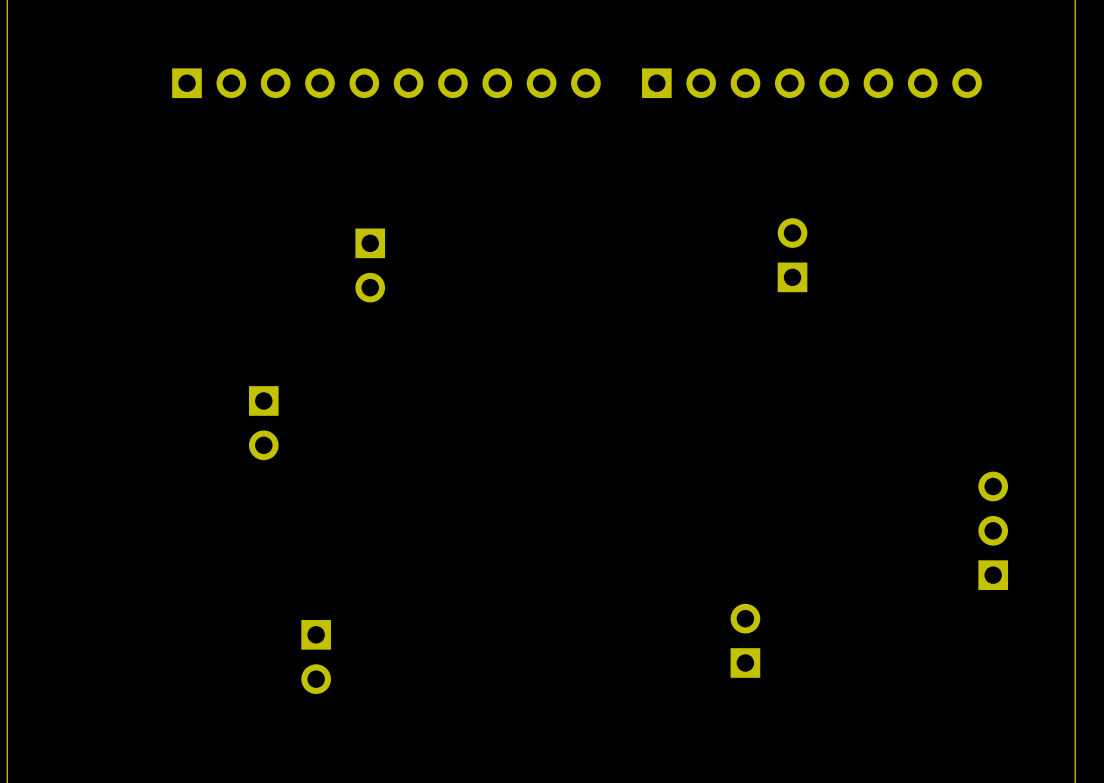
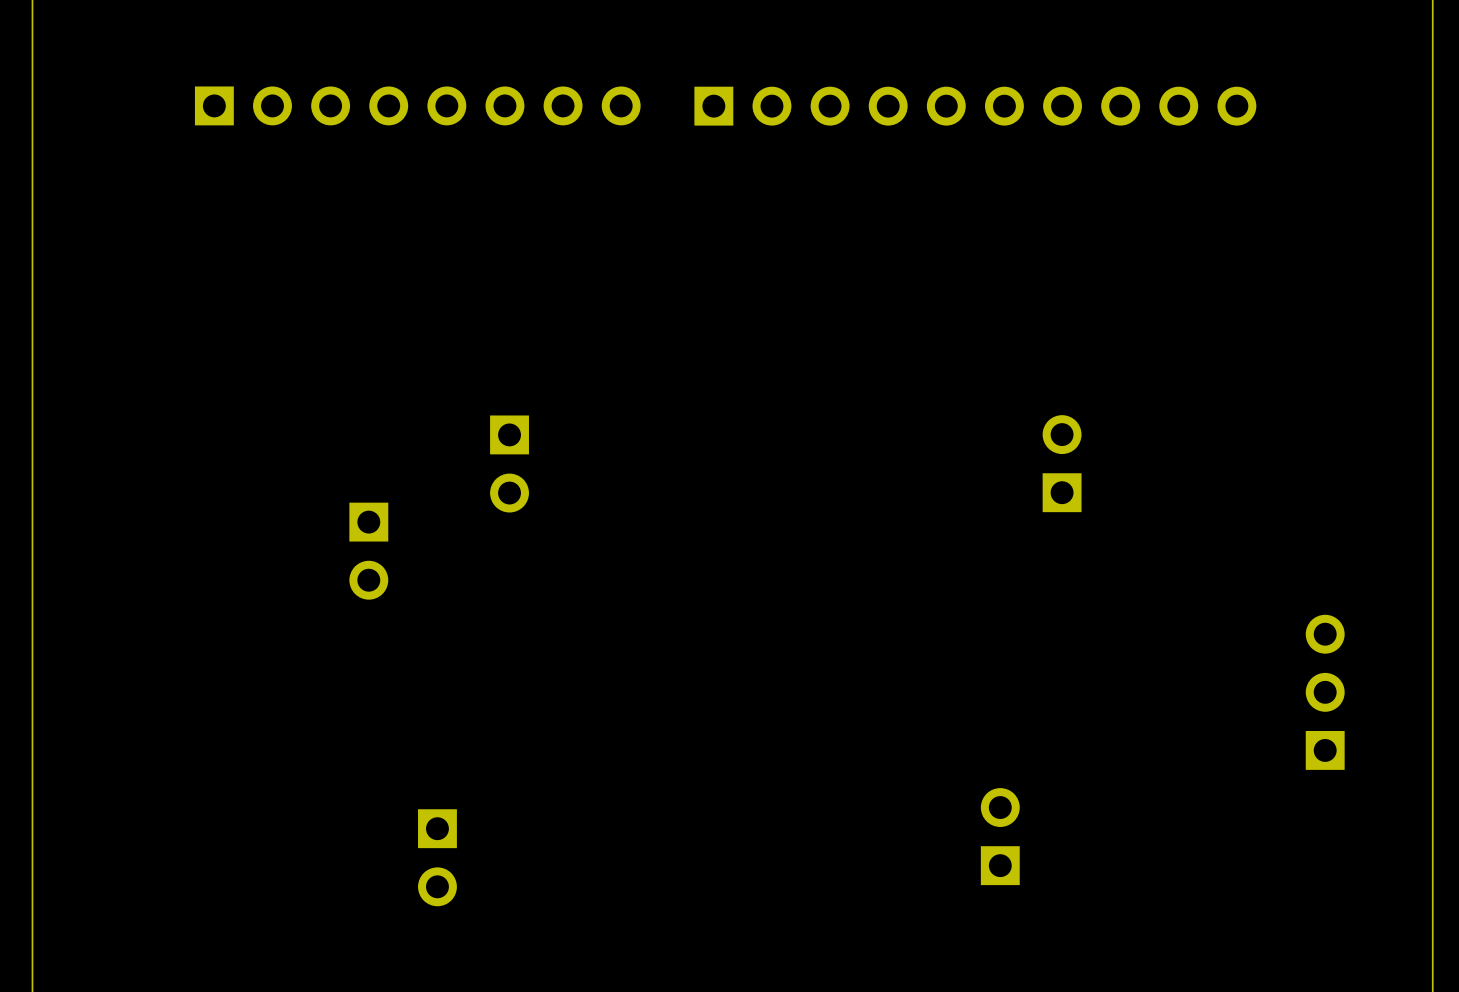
part: none -> (417, 105)
part position: (386, 83) -> (975, 106)
part: (811, 83) -> none
part position: (792, 255) -> (1062, 463)
part position: (370, 265) -> (509, 463)

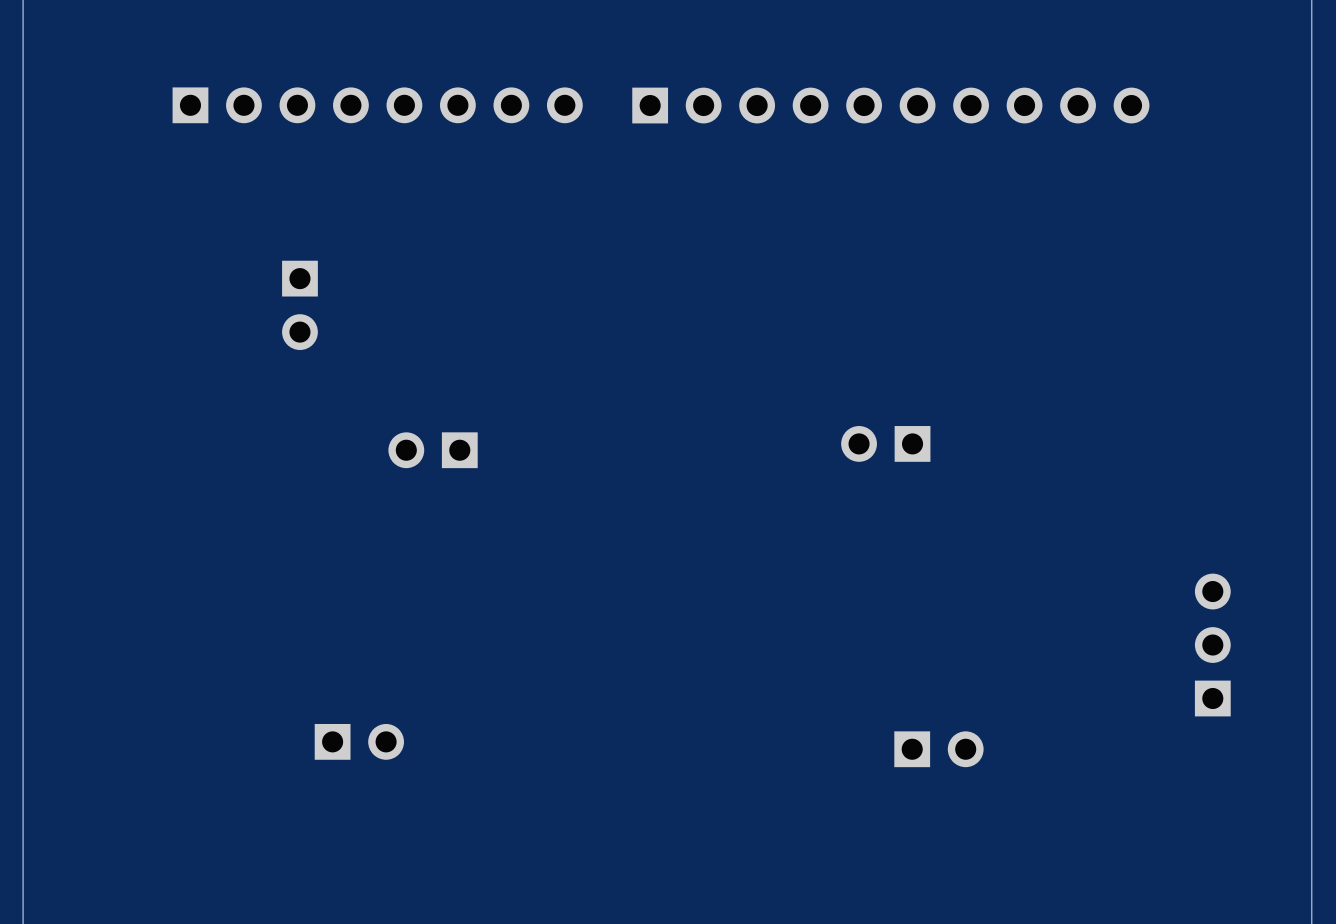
part: none -> (299, 305)
part rotation: 0° (509, 463) -> 90° clockwise (433, 450)
part rotation: 0° (1062, 463) -> 90° counterclockwise (885, 443)
part position: (1062, 463) -> (885, 443)
part: (368, 551) -> none
part rotation: 0° (1000, 836) -> 90° clockwise (938, 749)
part rotation: 0° (437, 857) -> 90° counterclockwise (359, 741)
part position: (437, 857) -> (359, 741)

